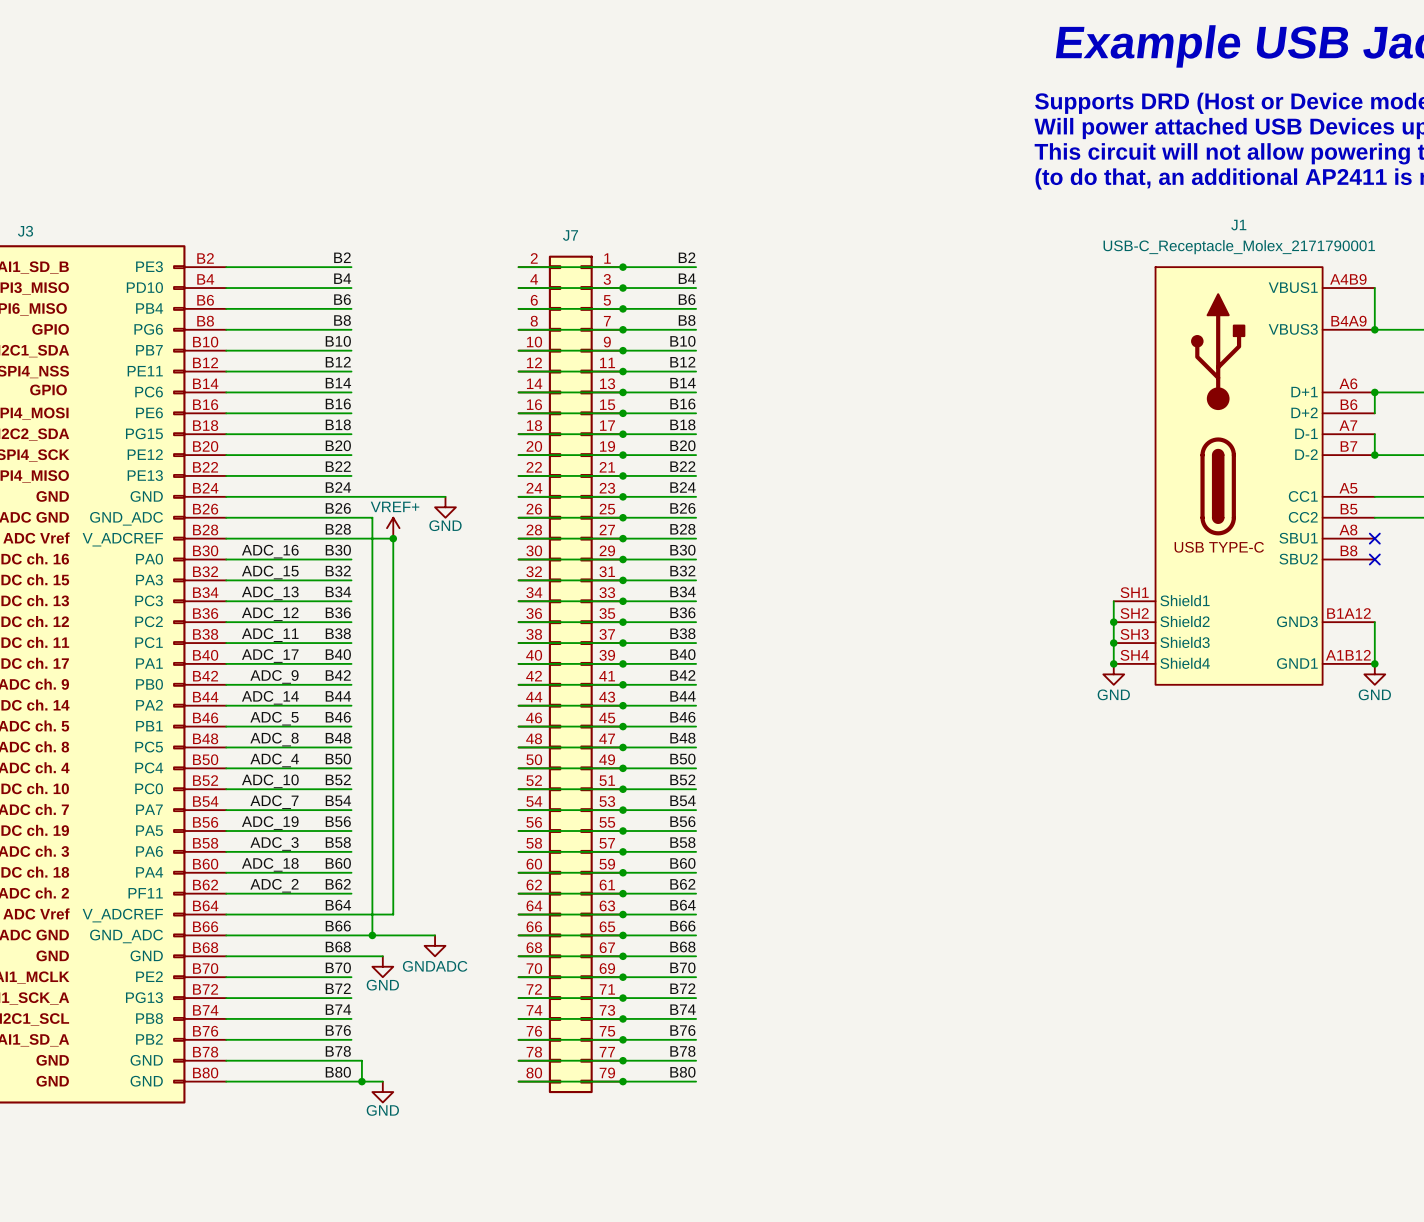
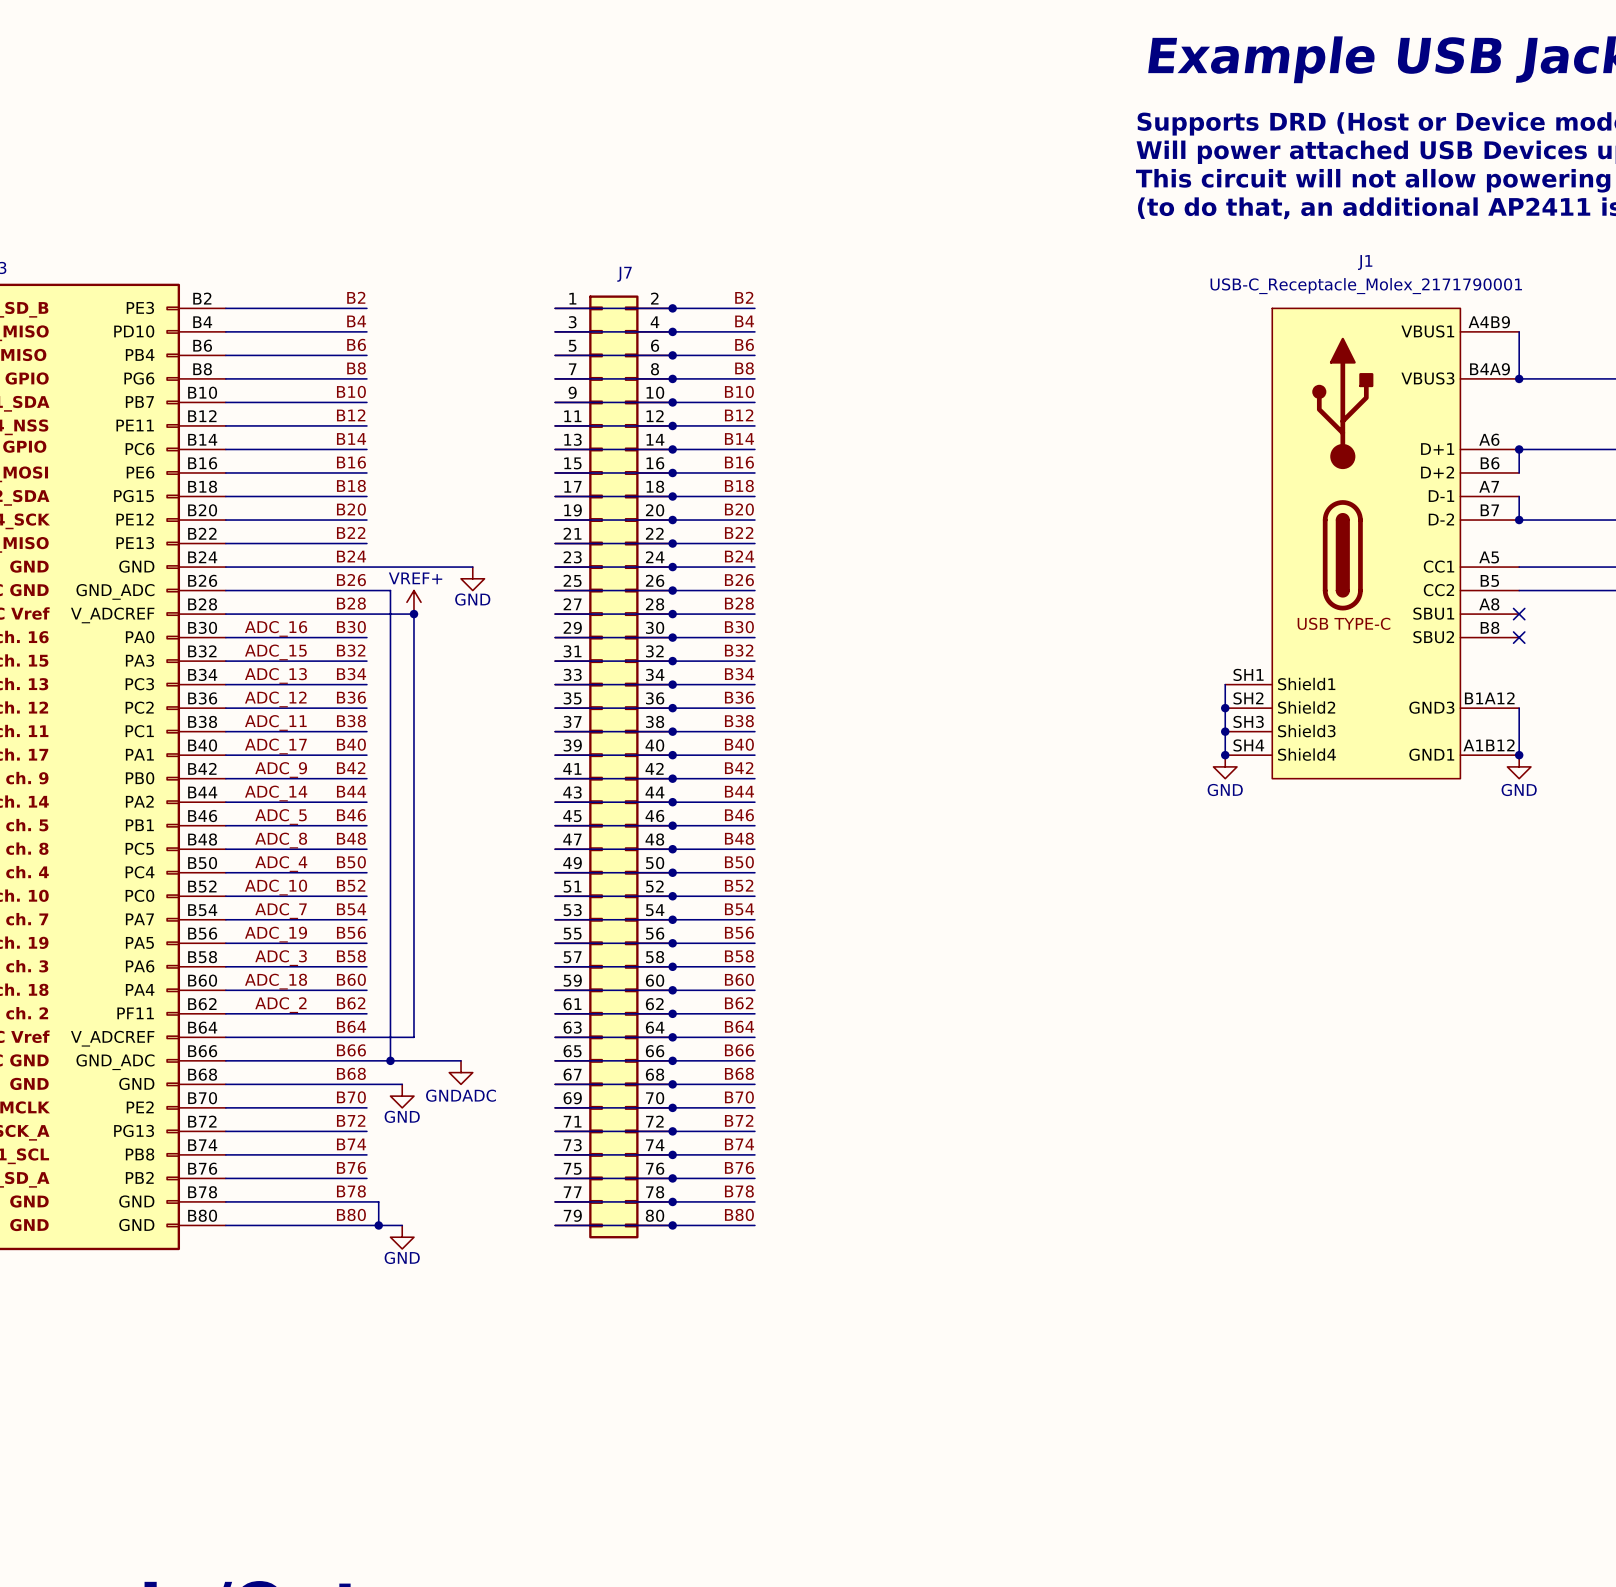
J7 flip: as is (570, 674) -> left-right (613, 766)

